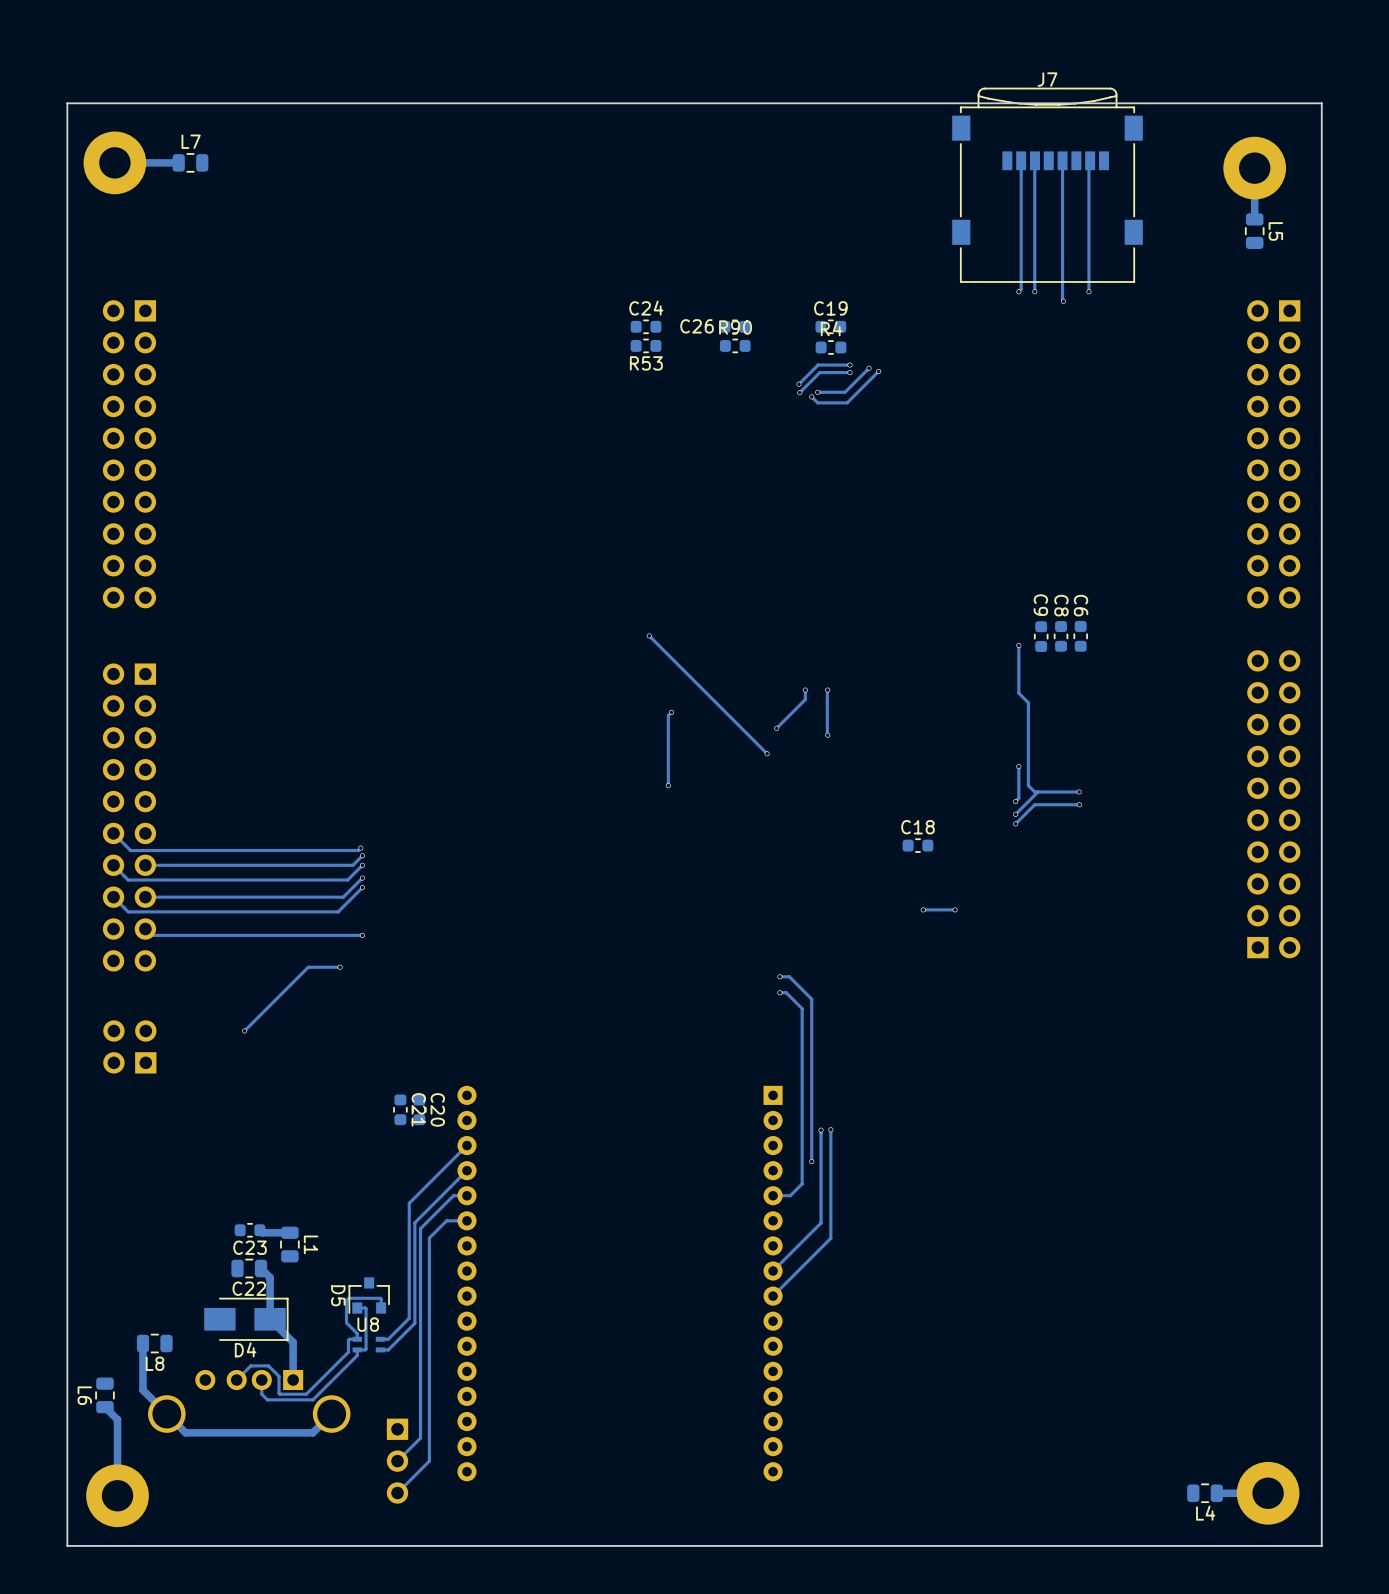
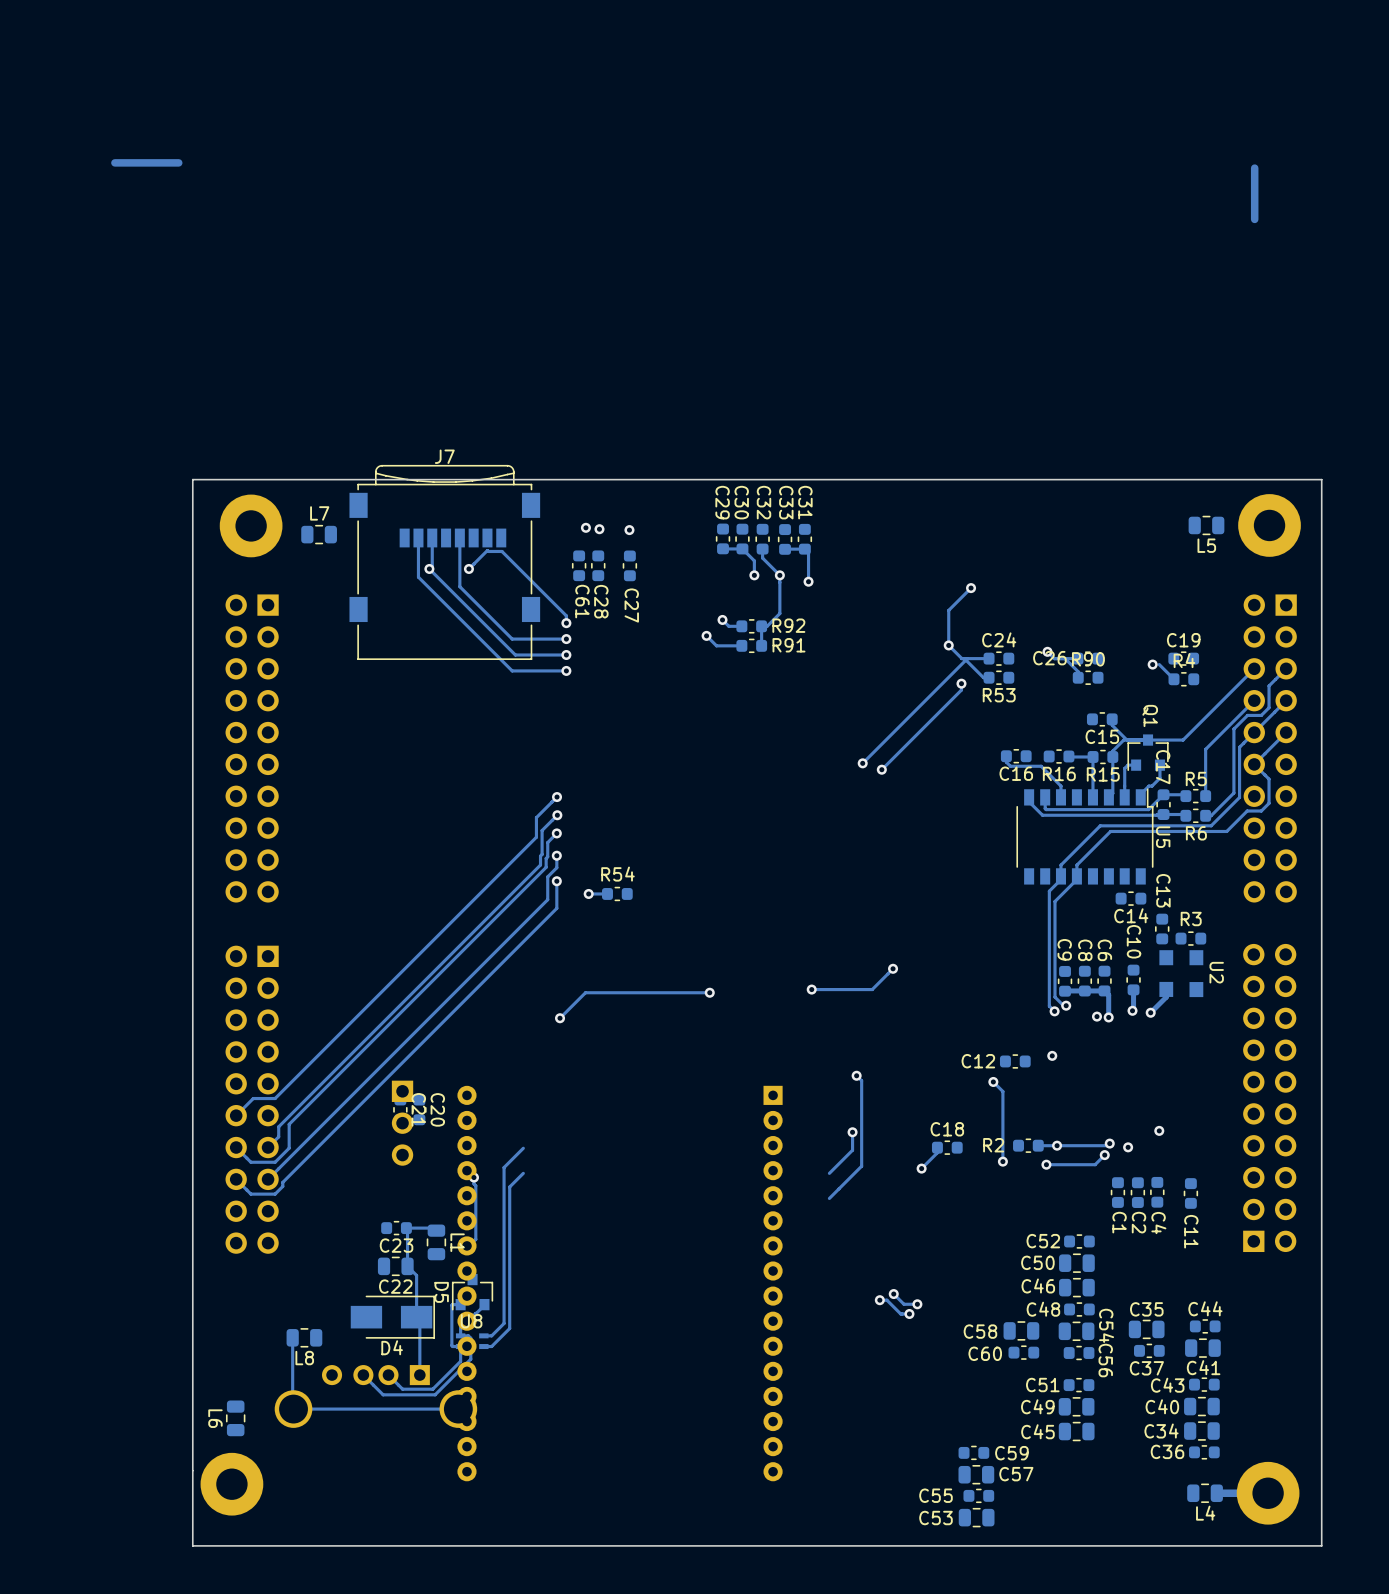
track: (1021, 160) (1021, 289) (1018, 291) -> none
track: (1034, 160) (1034, 291) -> none
track: (1062, 160) (1063, 301) -> none
track: (1090, 160) (1088, 291) -> none
part: (114, 162) -> none
L7 position: (190, 162) -> (319, 534)
part: (1254, 168) -> none
J7 position: (1047, 185) -> (444, 562)
L5 rotation: 0° (1254, 231) -> 90° clockwise (1206, 525)
L5 position: (1254, 231) -> (1206, 525)
via: (1018, 291) -> none
via: (1034, 291) -> none
via: (1088, 291) -> none
via: (1063, 301) -> none
C24 position: (646, 326) -> (998, 658)
C26 position: (734, 326) -> (1087, 658)
C19 position: (830, 326) -> (1183, 658)
R53 position: (646, 345) -> (998, 677)
R90 position: (735, 345) -> (1088, 677)
R4 position: (831, 347) -> (1183, 679)
track: (849, 365) (818, 365) (798, 384) -> none
via: (849, 365) -> none
track: (869, 368) (845, 392) (817, 392) -> none
via: (869, 368) -> none
track: (878, 371) (847, 402) (817, 402) (811, 396) -> none
via: (878, 371) -> none
track: (849, 372) (819, 372) (799, 392) -> none
via: (849, 372) -> none
via: (798, 384) -> none
via: (799, 392) -> none
via: (817, 392) -> none
via: (811, 396) -> none
part: (129, 454) -> none
part: (1273, 454) -> none
part: none -> (251, 525)
part: none -> (1269, 525)
via: none -> (585, 527)
via: none -> (599, 529)
via: none -> (629, 530)
track: none -> (418, 537) (418, 577) (512, 670) (566, 670)
track: none -> (432, 537) (432, 566) (429, 568) (515, 655) (566, 655)
track: none -> (459, 537) (459, 586) (512, 639) (566, 639)
C29: none -> (723, 538)
C30: none -> (742, 539)
C32: none -> (762, 539)
C33: none -> (785, 539)
C31: none -> (804, 539)
track: none -> (723, 548) (742, 548) (754, 560) (754, 575)
track: none -> (762, 549) (762, 558) (779, 575) (779, 613) (767, 626) (761, 626) (761, 645)
track: none -> (785, 549) (804, 549) (808, 552) (808, 581)
C61: none -> (579, 565)
C28: none -> (598, 565)
C27: none -> (629, 565)
via: none -> (429, 568)
track: none -> (468, 568) (487, 550) (502, 551) (566, 615) (566, 623)
via: none -> (468, 568)
via: none -> (754, 575)
via: none -> (779, 575)
via: none -> (808, 581)
track: none -> (971, 588) (948, 610) (948, 645) (961, 658) (989, 658)
via: none -> (971, 588)
track: none -> (722, 619) (728, 626) (741, 626)
via: none -> (722, 619)
via: none -> (566, 623)
R92: none -> (751, 626)
track: (649, 635) (767, 753) -> none
via: (649, 635) -> none
track: none -> (706, 635) (716, 645) (741, 645)
via: none -> (706, 635)
C9 position: (1041, 636) -> (1065, 981)
C8 position: (1061, 636) -> (1084, 981)
C6 position: (1080, 636) -> (1104, 981)
via: none -> (566, 639)
R91: none -> (751, 645)
via: none -> (948, 645)
track: (1018, 645) (1018, 693) (1028, 702) (1028, 785) (1034, 792) (1079, 792) -> none
via: (1018, 645) -> none
track: none -> (1047, 651) (1054, 658) (1077, 658)
via: none -> (1047, 651)
via: none -> (566, 655)
track: none -> (964, 658) (983, 677) (989, 677)
track: none -> (967, 658) (862, 763)
track: none -> (1065, 658) (1078, 671) (1078, 677)
via: none -> (1152, 664)
track: none -> (1159, 664) (1173, 679)
track: none -> (1254, 668) (1183, 740) (1123, 740) (1112, 751) (1112, 793) (1108, 797)
track: none -> (1286, 668) (1269, 685) (1269, 707) (1261, 715) (1247, 715) (1233, 729) (1233, 793) (1211, 815) (1205, 815)
via: none -> (566, 670)
track: none -> (961, 683) (961, 690) (881, 769)
via: none -> (961, 683)
track: (805, 690) (805, 699) (776, 728) -> none
via: (805, 690) -> none
track: (827, 690) (827, 735) -> none
via: (827, 690) -> none
track: none -> (1254, 700) (1205, 749) (1205, 796)
track: none -> (1286, 700) (1239, 747) (1239, 797) (1211, 825) (1100, 825) (1060, 865) (1060, 879) (1049, 891) (1049, 1006) (1054, 1011)
track: (671, 712) (668, 715) (668, 785) -> none
via: (671, 712) -> none
C15: none -> (1102, 719)
track: none -> (1112, 719) (1112, 725) (1126, 740)
via: (776, 728) -> none
track: none -> (1286, 732) (1254, 764) (1269, 779) (1269, 803) (1261, 811) (1247, 811) (1226, 831) (1110, 831) (1076, 865) (1076, 879) (1054, 901) (1054, 997) (1063, 1005) (1066, 1005)
via: (827, 735) -> none
Q1: none -> (1148, 752)
via: (767, 753) -> none
track: none -> (1006, 756) (1006, 762) (1010, 766) (1041, 766) (1060, 786) (1060, 797)
C16: none -> (1016, 756)
R16: none -> (1059, 756)
track: none -> (1068, 756) (1093, 756)
R15: none -> (1102, 756)
track: none -> (1092, 757) (1092, 797)
via: none -> (862, 763)
track: none -> (1136, 765) (1127, 765) (1124, 768) (1124, 797)
track: none -> (1159, 765) (1159, 778) (1152, 786) (1148, 786) (1140, 794) (1140, 797)
track: (1018, 766) (1018, 798) (1015, 801) -> none
via: (1018, 766) -> none
via: none -> (881, 769)
via: (668, 785) -> none
track: (1037, 792) (1015, 814) -> none
via: (1079, 792) -> none
track: none -> (1185, 796) (1163, 794) (1148, 809) (1046, 809) (1045, 797)
R5: none -> (1195, 796)
track: none -> (557, 797) (536, 817) (536, 837) (275, 1098) (253, 1098) (236, 1115)
via: none -> (557, 797)
track: none -> (1029, 797) (1029, 801) (1042, 815) (1185, 815)
via: (1015, 801) -> none
track: (1079, 804) (1034, 804) (1015, 823) -> none
via: (1079, 804) -> none
C17: none -> (1163, 804)
part rotation: 0° (1273, 804) -> 180° (1270, 748)
via: (1015, 814) -> none
track: none -> (557, 815) (542, 830) (540, 865) (278, 1126) (278, 1136) (268, 1147)
via: none -> (557, 815)
R6: none -> (1195, 815)
part position: (129, 817) -> (252, 748)
via: (1015, 823) -> none
track: (113, 833) (130, 850) (358, 850) (360, 848) -> none
track: none -> (556, 833) (547, 842) (546, 867) (289, 1124) (289, 1148) (275, 1162) (250, 1162) (236, 1147)
via: none -> (556, 833)
U5: none -> (1084, 836)
C18 position: (917, 845) -> (947, 1147)
via: (360, 848) -> none
track: (362, 855) (352, 865) (145, 865) -> none
via: (362, 855) -> none
track: none -> (556, 855) (556, 867) (547, 876) (547, 899) (268, 1179)
via: none -> (556, 855)
track: (362, 865) (347, 880) (128, 880) (113, 865) -> none
via: (362, 865) -> none
track: (362, 878) (343, 897) (145, 897) -> none
via: (362, 878) -> none
track: none -> (556, 881) (556, 908) (282, 1182) (282, 1186) (275, 1194) (250, 1194) (236, 1179)
via: none -> (556, 881)
track: (362, 887) (338, 911) (128, 911) (113, 897) -> none
via: (362, 887) -> none
via: none -> (588, 893)
track: none -> (607, 893) (588, 893)
R54: none -> (617, 893)
C14: none -> (1130, 898)
via: (923, 909) -> none
track: (955, 909) (923, 909) -> none
via: (955, 909) -> none
track: (145, 929) (151, 935) (362, 935) -> none
C13: none -> (1162, 929)
via: (362, 935) -> none
R3: none -> (1190, 938)
track: (340, 967) (308, 967) (244, 1030) -> none
via: (340, 967) -> none
track: none -> (893, 968) (872, 989) (811, 989)
via: none -> (893, 968)
U2: none -> (1181, 973)
track: (779, 976) (789, 976) (811, 999) (811, 1161) -> none
via: (779, 976) -> none
C10: none -> (1133, 980)
via: none -> (811, 989)
track: none -> (1133, 989) (1132, 1010)
track: none -> (1166, 989) (1166, 997) (1150, 1012)
track: none -> (1065, 991) (1104, 990) (1108, 995) (1108, 1017)
track: none -> (709, 992) (585, 992) (560, 1018)
via: none -> (709, 992)
track: (779, 992) (786, 992) (802, 1008) (802, 1183) (790, 1195) (773, 1195) -> none
via: (779, 992) -> none
via: none -> (1066, 1005)
via: none -> (1132, 1010)
via: none -> (1054, 1011)
via: none -> (1150, 1012)
via: none -> (1096, 1016)
via: none -> (1108, 1017)
via: none -> (560, 1018)
via: (244, 1030) -> none
part: (129, 1046) -> none
via: none -> (1052, 1055)
C12: none -> (1015, 1061)
track: none -> (856, 1075) (861, 1080) (861, 1166) (829, 1198)
via: none -> (856, 1075)
track: none -> (993, 1081) (1002, 1091) (1002, 1161)
via: none -> (993, 1081)
part: none -> (1269, 1097)
part: none -> (252, 1099)
part: none -> (402, 1123)
track: (830, 1129) (830, 1238) (773, 1296) -> none
via: (830, 1129) -> none
track: (821, 1130) (821, 1223) (773, 1271) -> none
via: (821, 1130) -> none
via: none -> (1159, 1130)
track: none -> (852, 1132) (852, 1150) (829, 1173)
via: none -> (852, 1132)
track: none -> (1109, 1143) (1107, 1145) (1038, 1145)
via: none -> (1109, 1143)
track: (466, 1145) (409, 1203) (409, 1318) (388, 1339) (380, 1339) -> none
R2: none -> (1028, 1145)
via: none -> (1057, 1145)
track: none -> (937, 1147) (937, 1152) (921, 1168)
via: none -> (1128, 1147)
track: none -> (523, 1148) (504, 1167) (504, 1323) (491, 1335) (483, 1335)
track: none -> (1104, 1155) (1095, 1164) (1046, 1164)
via: none -> (1104, 1155)
via: (811, 1161) -> none
via: none -> (1002, 1161)
via: none -> (1046, 1164)
via: none -> (921, 1168)
track: (466, 1170) (414, 1222) (414, 1323) (388, 1349) (380, 1349) -> none
track: none -> (523, 1173) (509, 1187) (509, 1328) (491, 1346) (483, 1346)
track: none -> (473, 1177) (475, 1185) (475, 1239) (470, 1244)
via: none -> (473, 1177)
C1: none -> (1117, 1192)
C2: none -> (1137, 1192)
C4: none -> (1157, 1192)
C11: none -> (1190, 1193)
track: (466, 1195) (453, 1195) (420, 1228) (420, 1438) (397, 1461) -> none
track: (466, 1220) (446, 1220) (429, 1238) (429, 1461) (397, 1492) -> none
C23 position: (250, 1230) -> (396, 1228)
track: (259, 1230) (262, 1232) (289, 1232) -> none
track: none -> (436, 1230) (433, 1228) (406, 1228) (407, 1266) (416, 1275) (416, 1317) (419, 1320) (419, 1375)
C52: none -> (1079, 1241)
L1 position: (289, 1244) -> (436, 1242)
C50: none -> (1076, 1263)
C22 position: (249, 1268) -> (395, 1266)
track: (261, 1268) (270, 1277) (270, 1319) (293, 1342) (293, 1380) -> none
C46: none -> (1076, 1287)
track: none -> (893, 1294) (903, 1304) (917, 1304)
via: none -> (893, 1294)
D5 position: (369, 1295) -> (472, 1292)
track: none -> (879, 1300) (886, 1300) (900, 1313) (909, 1313)
via: none -> (879, 1300)
track: none -> (460, 1304) (451, 1305) (451, 1345) (460, 1346) (460, 1361) (432, 1389) (402, 1389) (388, 1375)
track: none -> (484, 1304) (460, 1328) (460, 1335) (468, 1335) (470, 1338) (470, 1359) (435, 1394) (383, 1394) (363, 1375)
via: none -> (917, 1304)
track: (357, 1308) (366, 1308) (366, 1348) (357, 1349) (357, 1355) (312, 1399) (267, 1399) (261, 1394) (261, 1380) -> none
track: (381, 1308) (380, 1298) (348, 1298) (346, 1300) (346, 1322) (357, 1333) (357, 1339) (348, 1340) (348, 1352) (306, 1394) (279, 1394) (279, 1376) (268, 1365) (250, 1365) (236, 1380) -> none
C48: none -> (1079, 1309)
via: none -> (909, 1313)
D4 position: (246, 1319) -> (392, 1317)
C44: none -> (1205, 1326)
C35: none -> (1146, 1329)
C58: none -> (1021, 1330)
C54: none -> (1076, 1331)
track: none -> (292, 1337) (293, 1409) (458, 1409)
track: (142, 1343) (142, 1390) (185, 1432) (312, 1432) (331, 1414) -> none
L8 position: (154, 1343) -> (304, 1337)
U8 position: (368, 1344) -> (472, 1341)
C41: none -> (1202, 1348)
C37: none -> (1149, 1350)
C60: none -> (1023, 1352)
C56: none -> (1079, 1353)
C43: none -> (1204, 1384)
C51: none -> (1078, 1385)
L6 position: (104, 1395) -> (235, 1418)
part position: (249, 1401) -> (375, 1396)
C49: none -> (1076, 1406)
C40: none -> (1201, 1406)
track: (104, 1407) (117, 1419) (117, 1495) -> none
C45: none -> (1076, 1431)
C34: none -> (1201, 1431)
C59: none -> (973, 1452)
C36: none -> (1204, 1452)
part: (397, 1461) -> none
C57: none -> (976, 1474)
part position: (117, 1495) -> (231, 1484)
C55: none -> (978, 1495)
C53: none -> (976, 1517)
board edge: (1321, 1545) (1321, 103) (67, 103) (67, 1545) (192, 1545) -> (1321, 1545) (1321, 479) (192, 479) (192, 1545)

